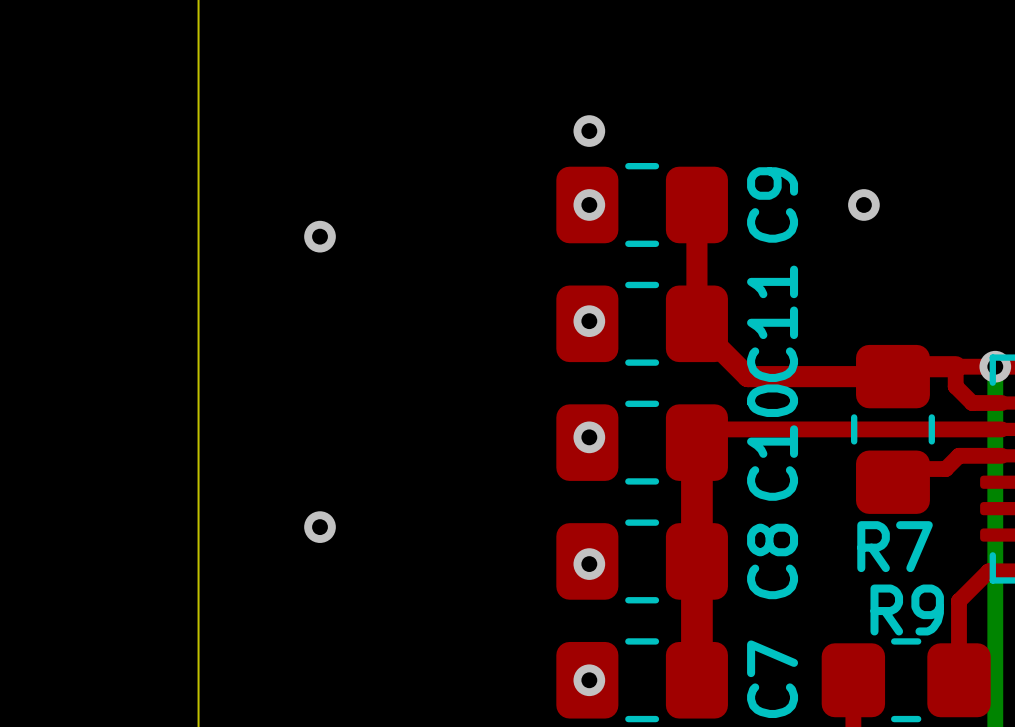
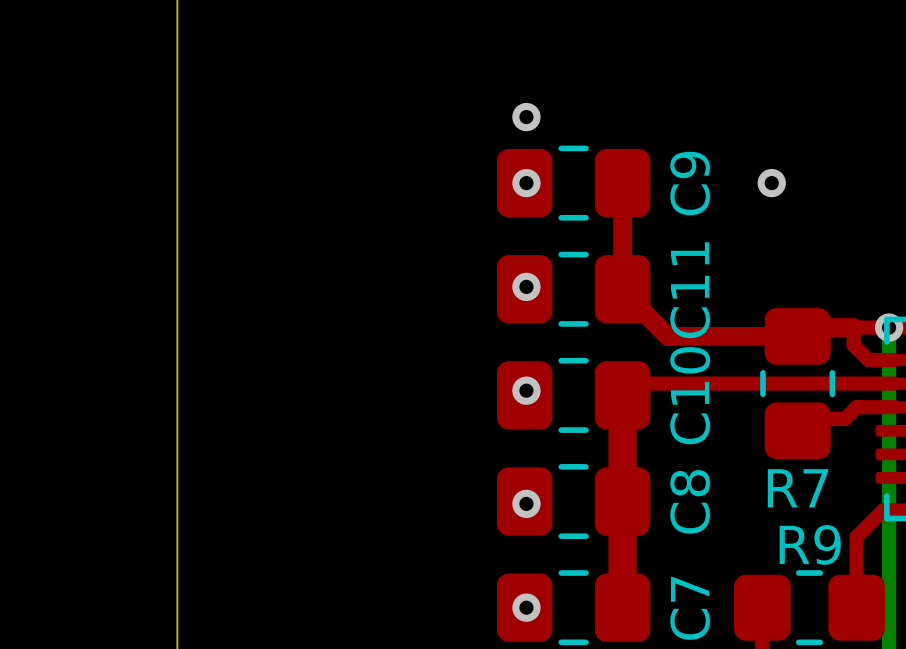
via: (320, 236) -> none
via: (320, 527) -> none

